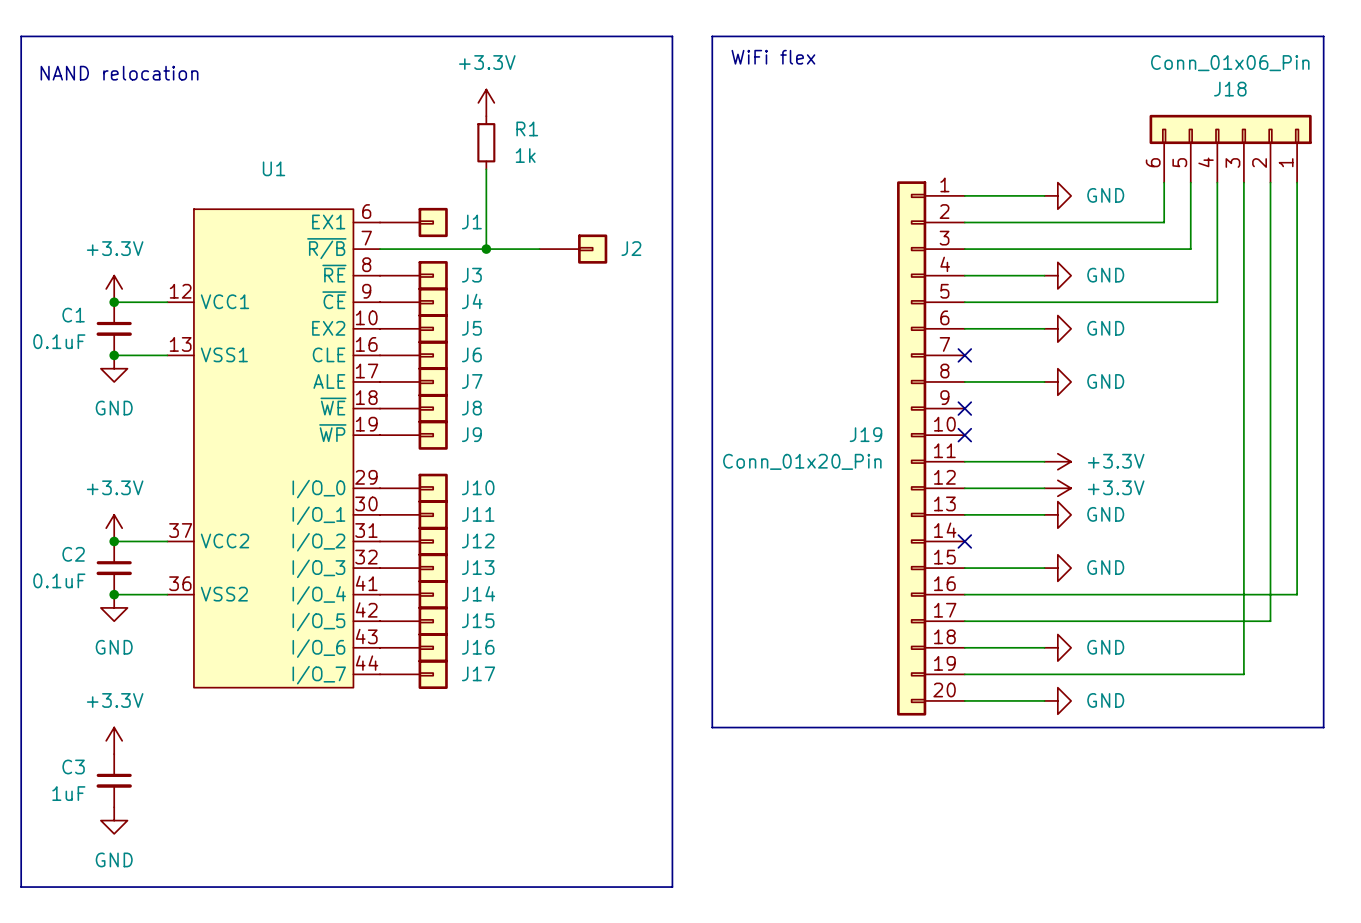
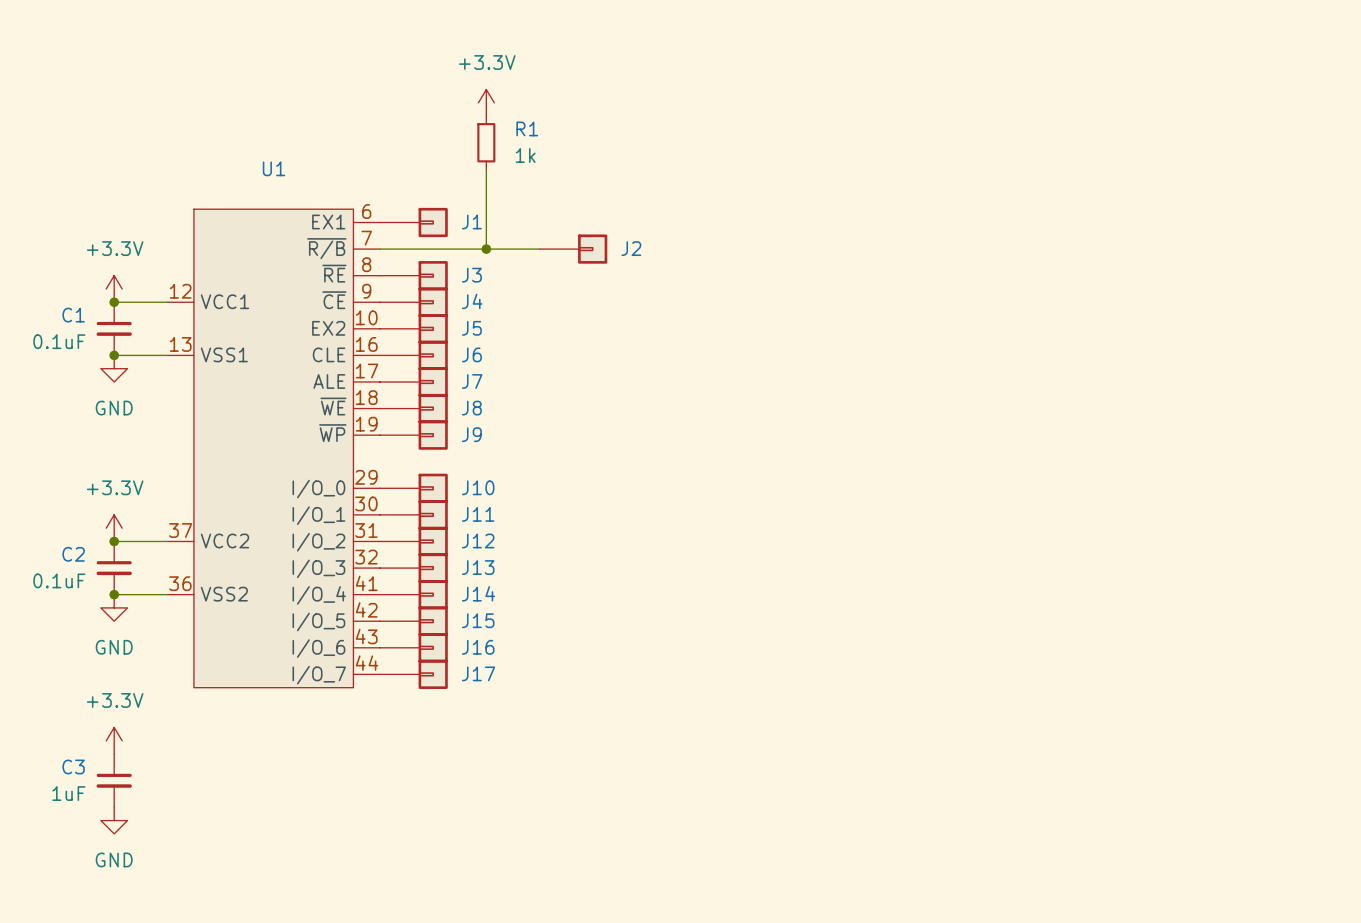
line: (21, 36) (672, 36) (672, 887) (21, 887) (21, 36) -> none
line: (712, 36) (1323, 36) (1323, 727) (712, 727) (712, 36) -> none
text: WiFi flex (773, 57) -> none
text: NAND relocation (119, 73) -> none
J18: Conn_01x06_Pin (1230, 148) -> none
wire: (1164, 182) (1164, 222) (964, 222) -> none
wire: (1190, 182) (1190, 249) (964, 249) -> none
wire: (1217, 182) (1217, 302) (964, 302) -> none
wire: (1243, 182) (1243, 674) (964, 674) -> none
wire: (1270, 182) (1270, 621) (964, 621) -> none
wire: (1297, 182) (1297, 594) (964, 594) -> none
wire: (964, 195) (1044, 195) -> none
power symbol: GND (1057, 195) -> none
wire: (964, 275) (1044, 275) -> none
power symbol: GND (1057, 275) -> none
wire: (964, 328) (1044, 328) -> none
power symbol: GND (1057, 328) -> none
no-connect mark: (964, 355) -> none
wire: (964, 381) (1044, 381) -> none
power symbol: GND (1057, 381) -> none
no-connect mark: (964, 408) -> none
no-connect mark: (964, 435) -> none
J19: Conn_01x20_Pin (930, 448) -> none
wire: (964, 461) (1044, 461) -> none
power symbol: +3.3V (1057, 461) -> none
wire: (964, 488) (1044, 488) -> none
power symbol: +3.3V (1057, 488) -> none
wire: (964, 514) (1044, 514) -> none
power symbol: GND (1057, 514) -> none
no-connect mark: (964, 541) -> none
wire: (964, 568) (1044, 568) -> none
power symbol: GND (1057, 568) -> none
wire: (964, 647) (1044, 647) -> none
power symbol: GND (1057, 647) -> none
wire: (964, 700) (1044, 700) -> none
power symbol: GND (1057, 700) -> none

